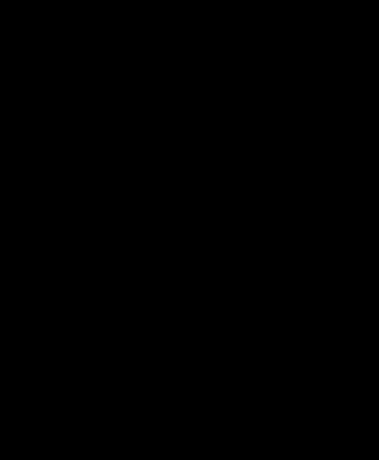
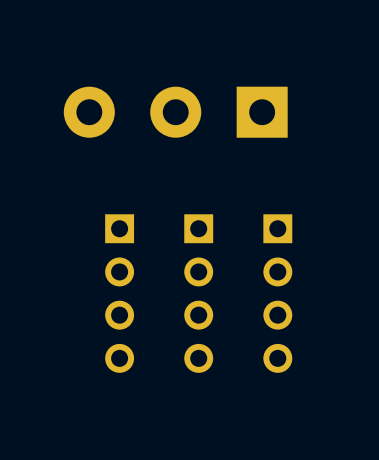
part: none -> (175, 112)
part: none -> (119, 293)
part: none -> (198, 293)
part: none -> (277, 293)

